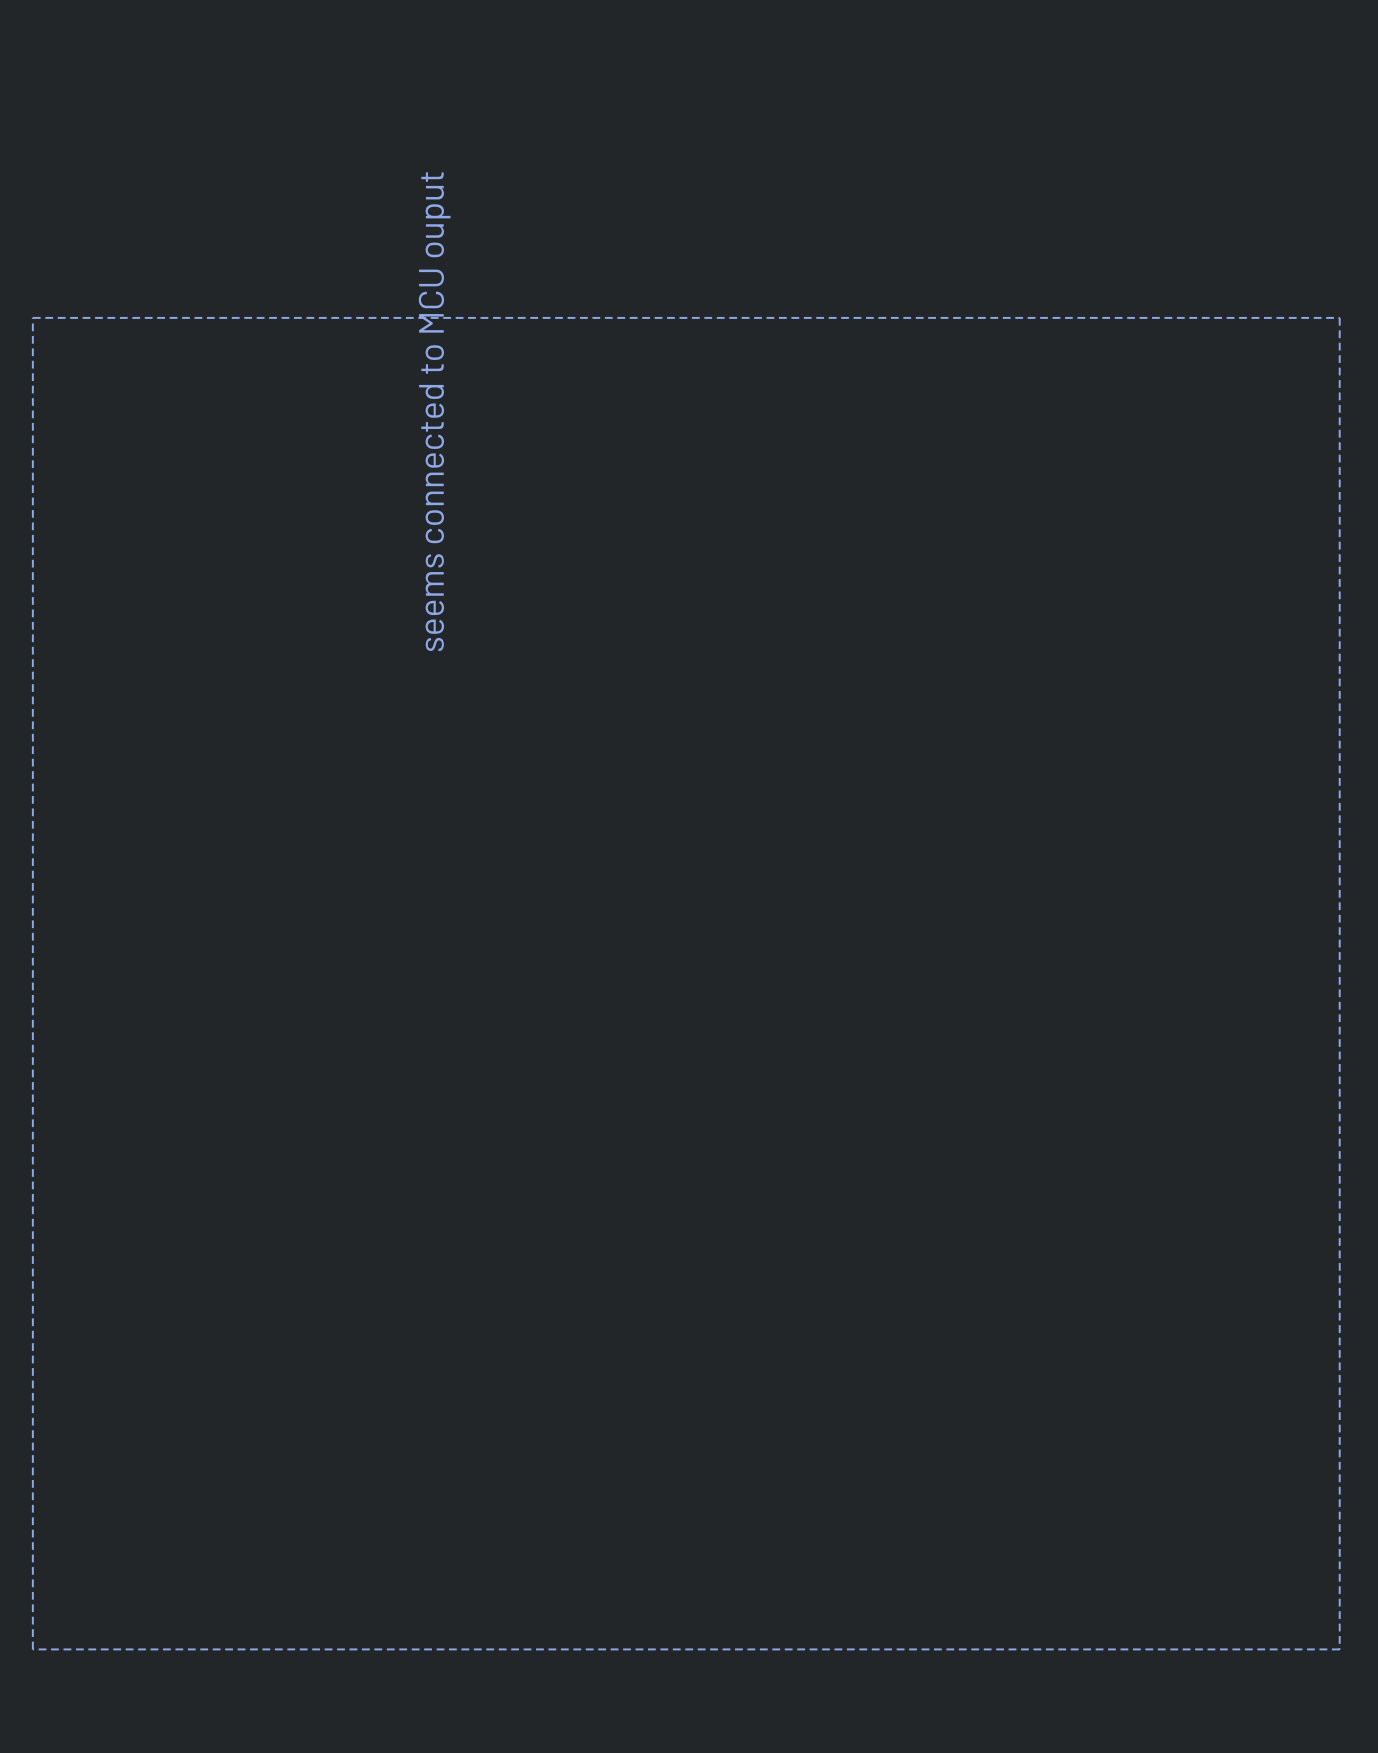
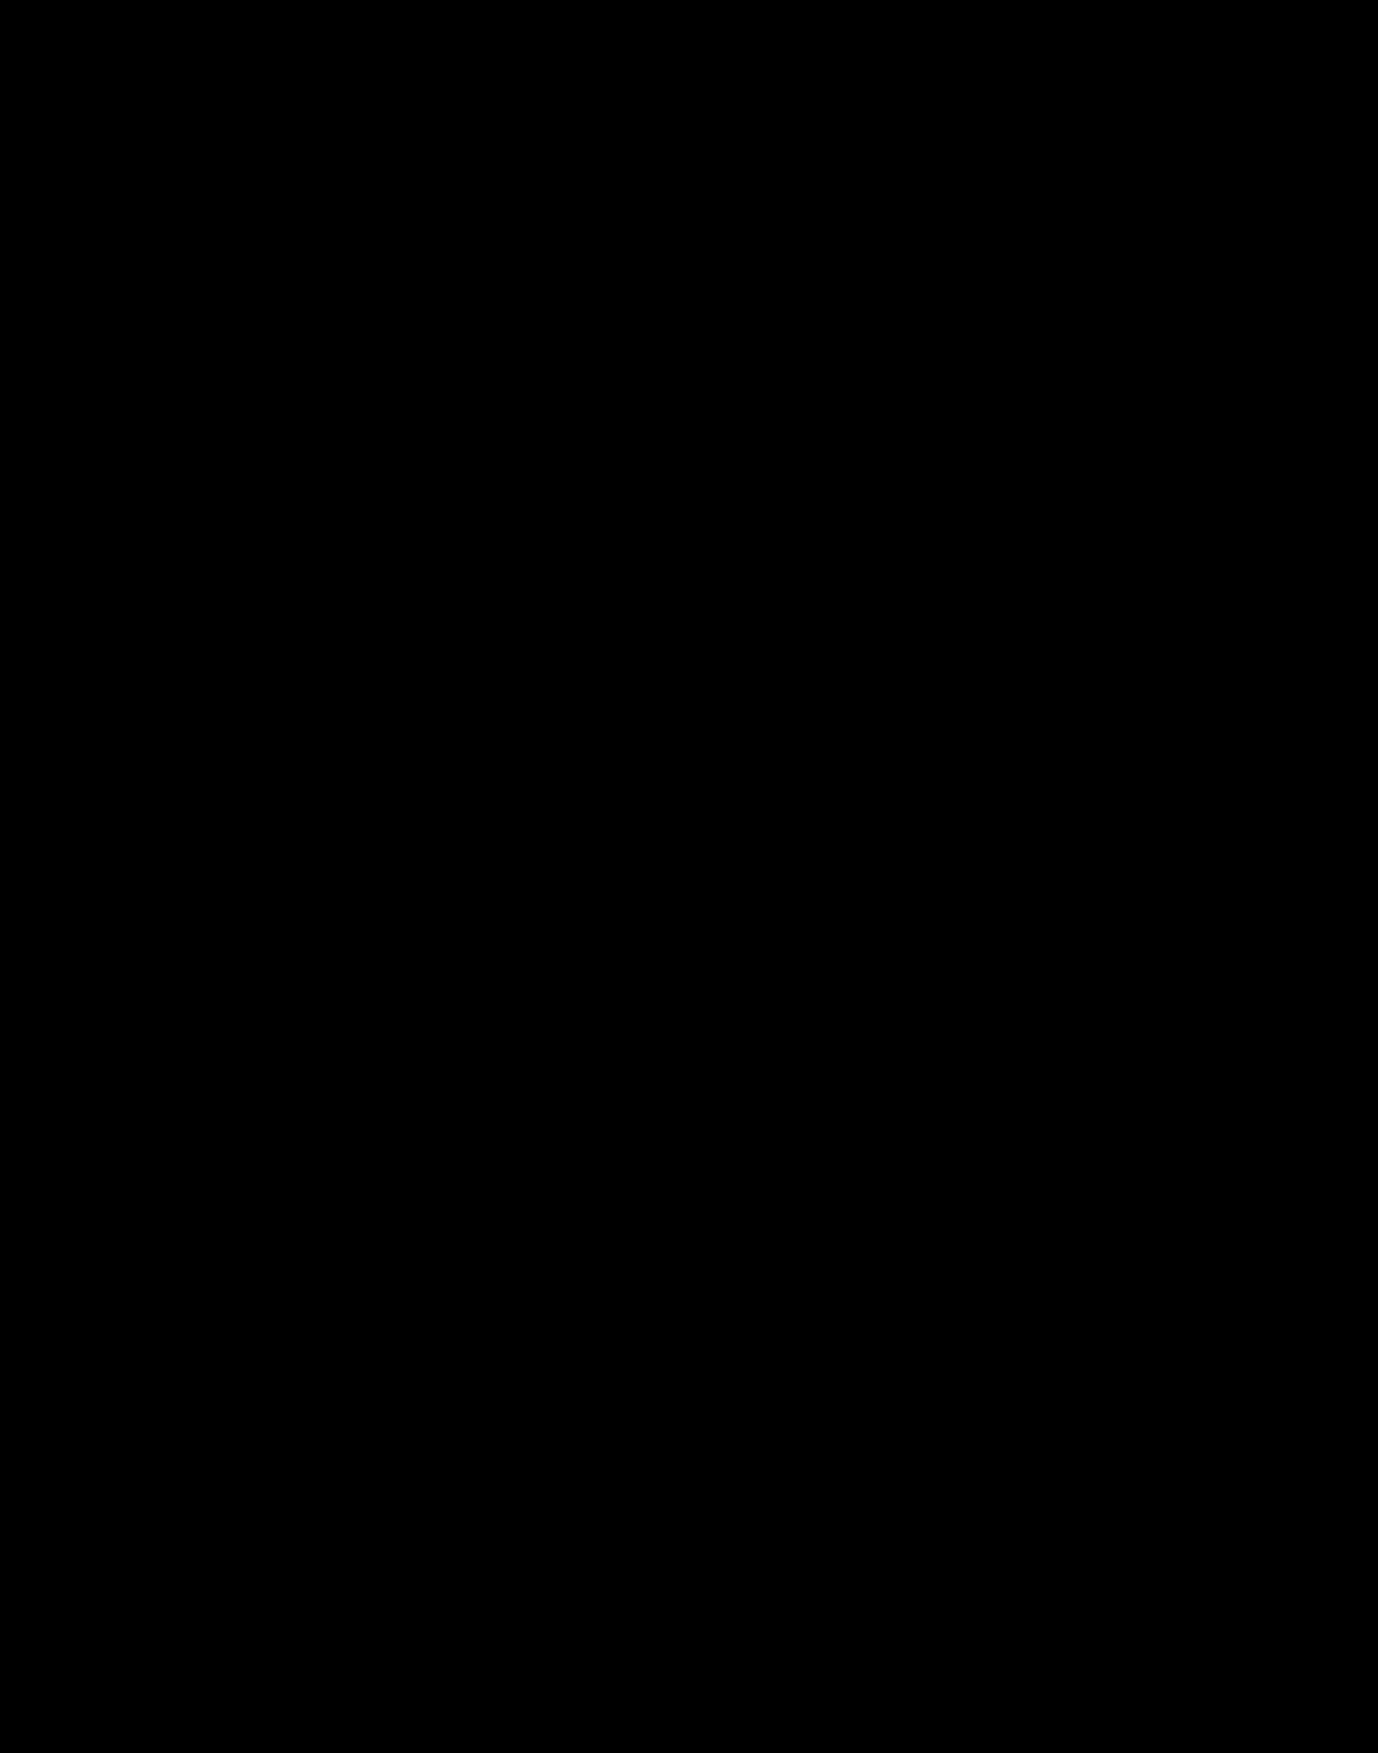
line: (32, 317) (1339, 317) (1339, 1649) (32, 1649) (32, 317) -> none
text: seems connected to MCU ouput (434, 411) -> none

